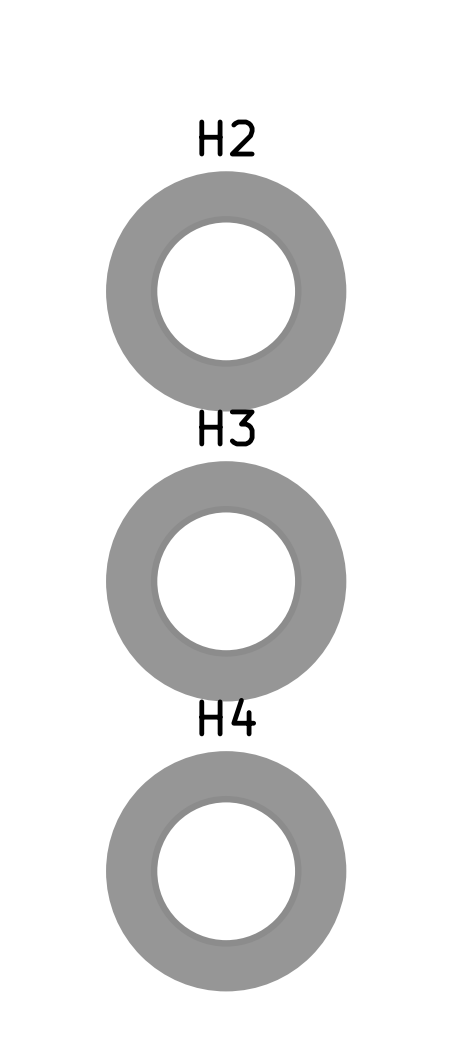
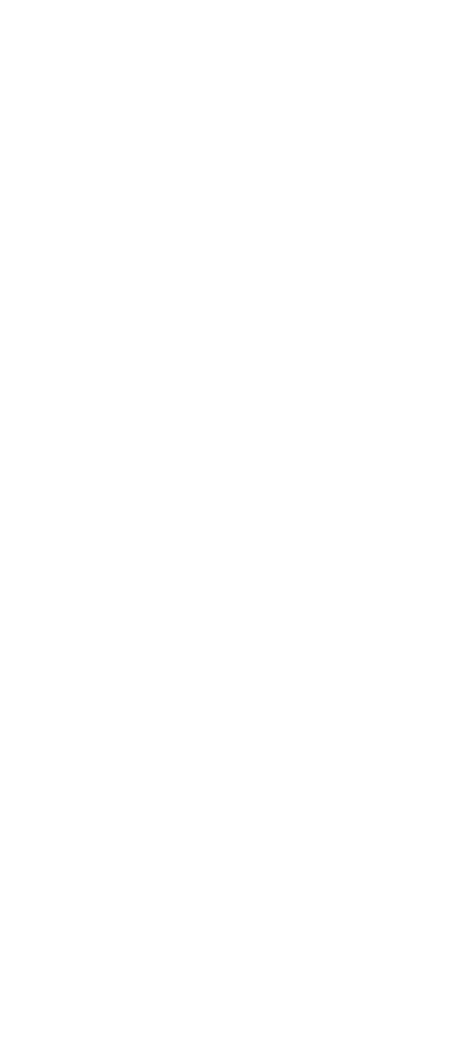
H2: (226, 291) -> none
H3: (226, 581) -> none
H4: (226, 871) -> none

